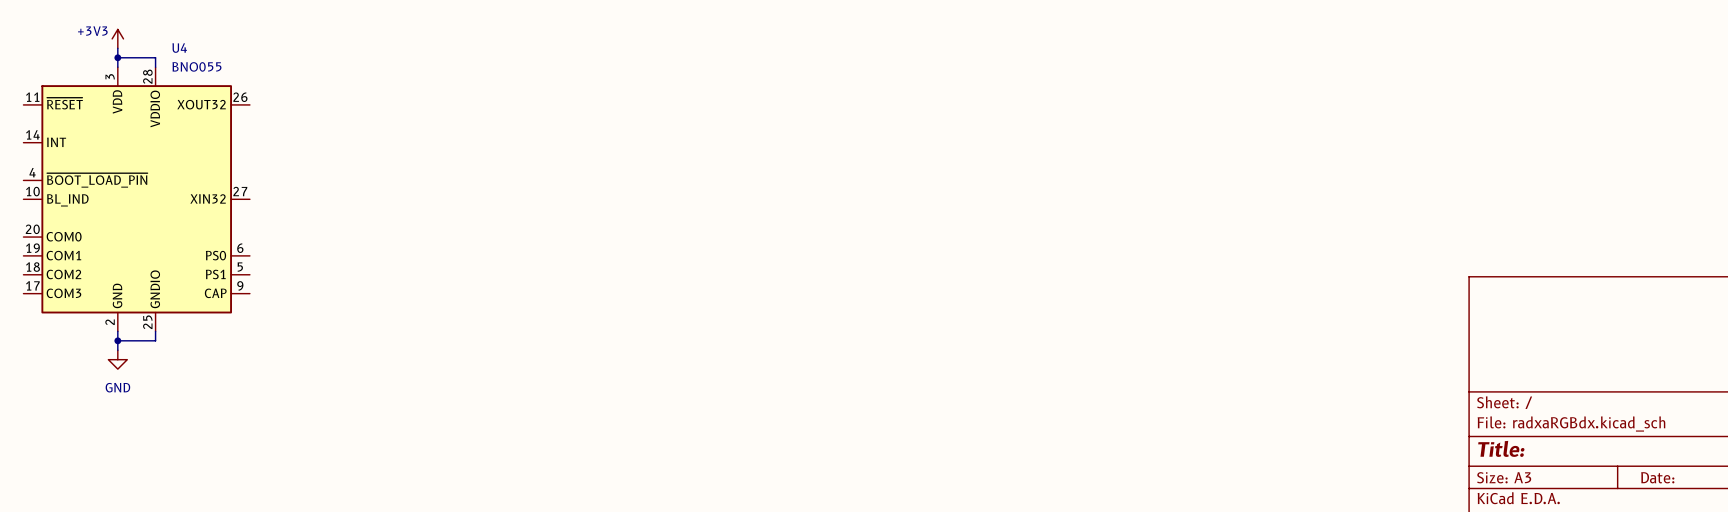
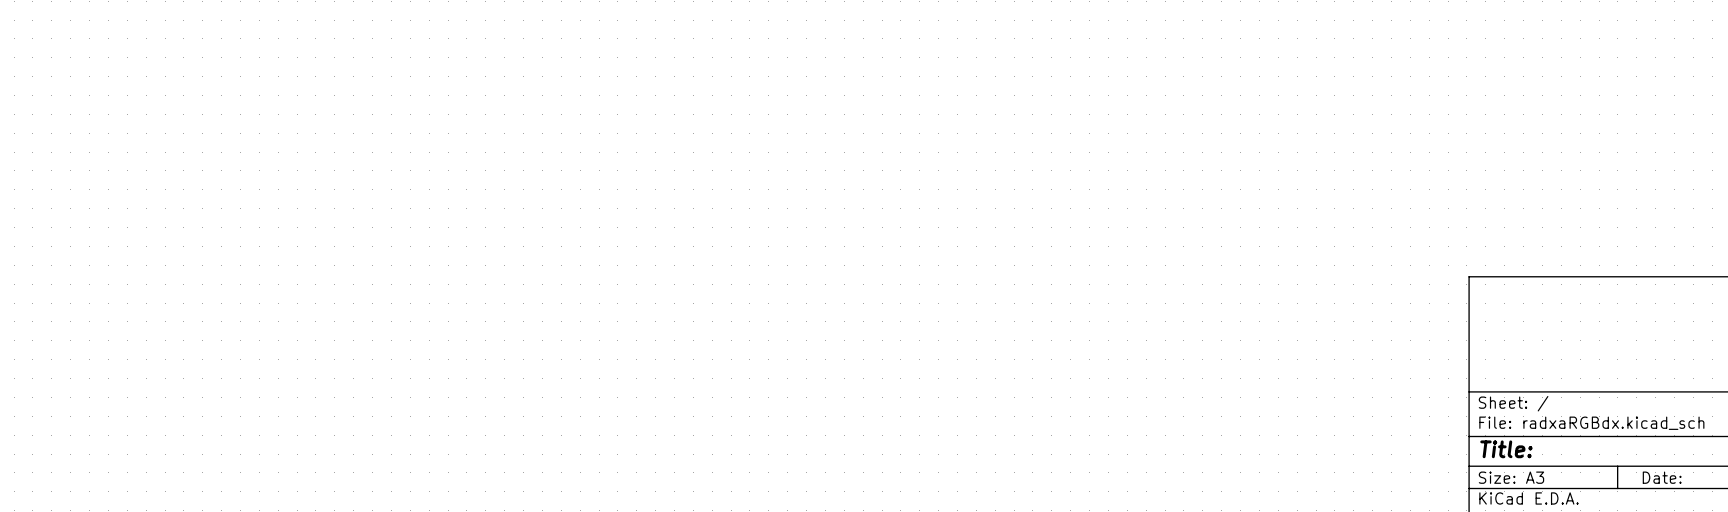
power symbol: +3V3 (117, 38) -> none
wire: (117, 48) (117, 67) -> none
wire: (117, 57) (155, 57) (155, 67) -> none
junction: (117, 57) -> none
U4: BNO055 (136, 199) -> none
wire: (117, 331) (117, 350) -> none
wire: (155, 331) (155, 340) (117, 340) -> none
junction: (117, 340) -> none
power symbol: GND (117, 359) -> none

